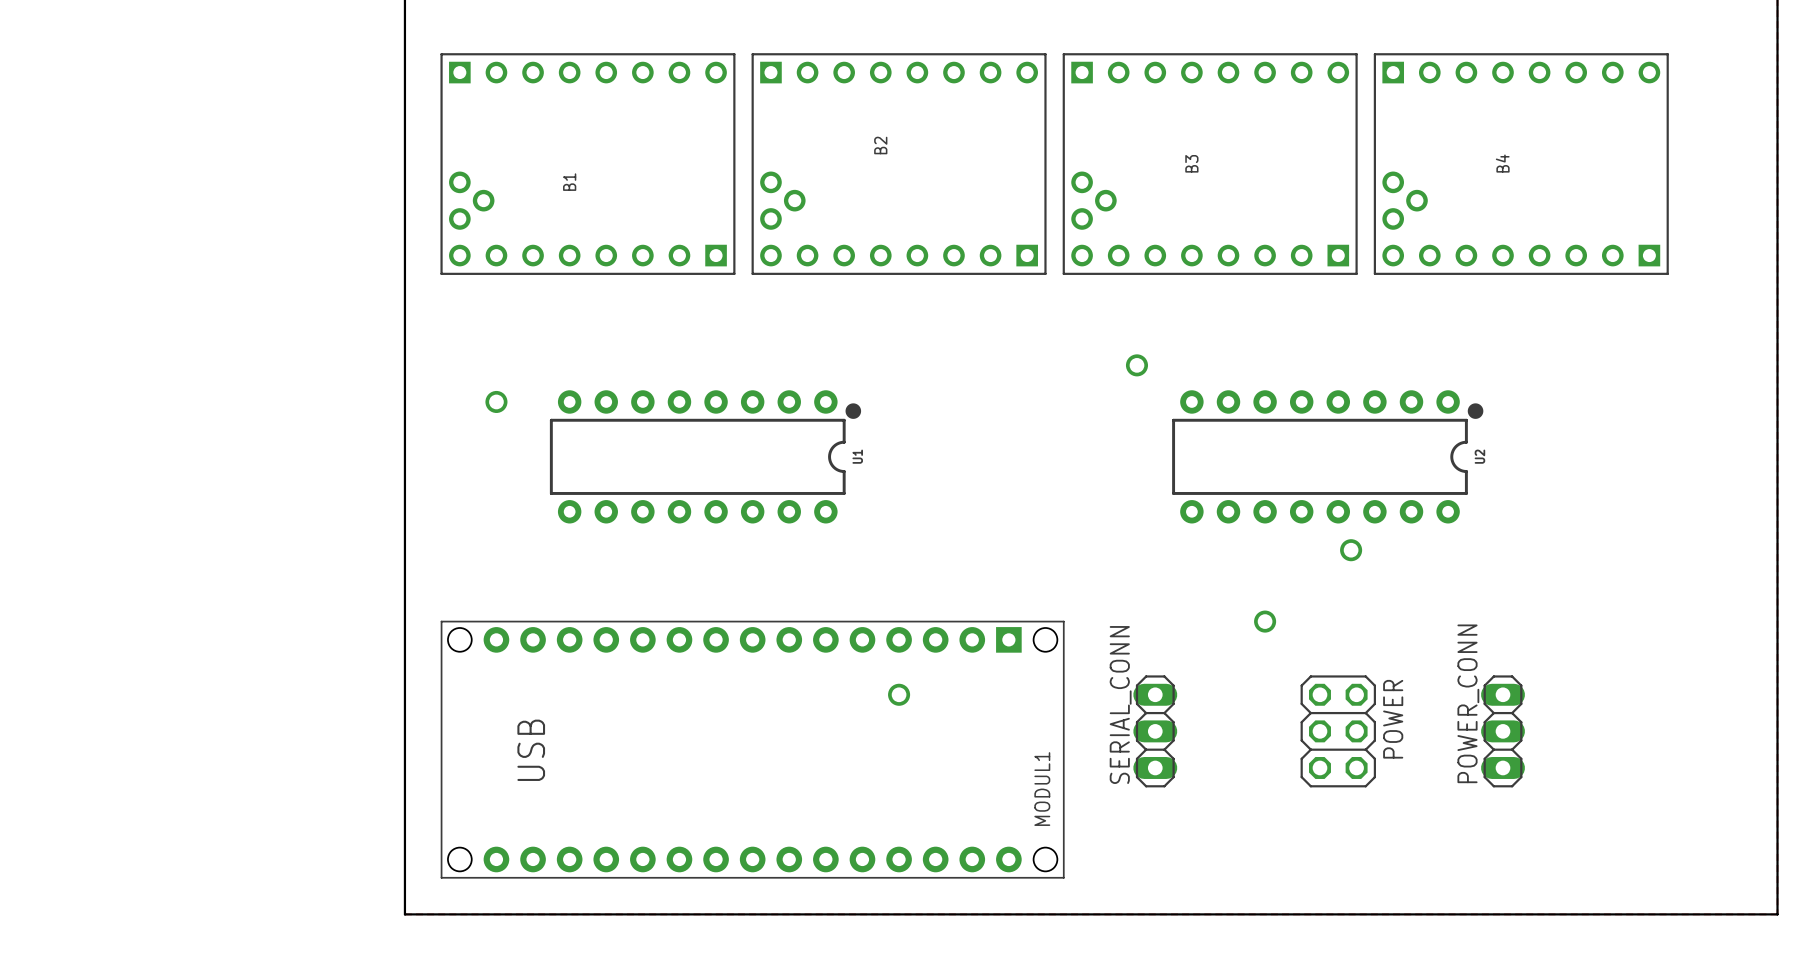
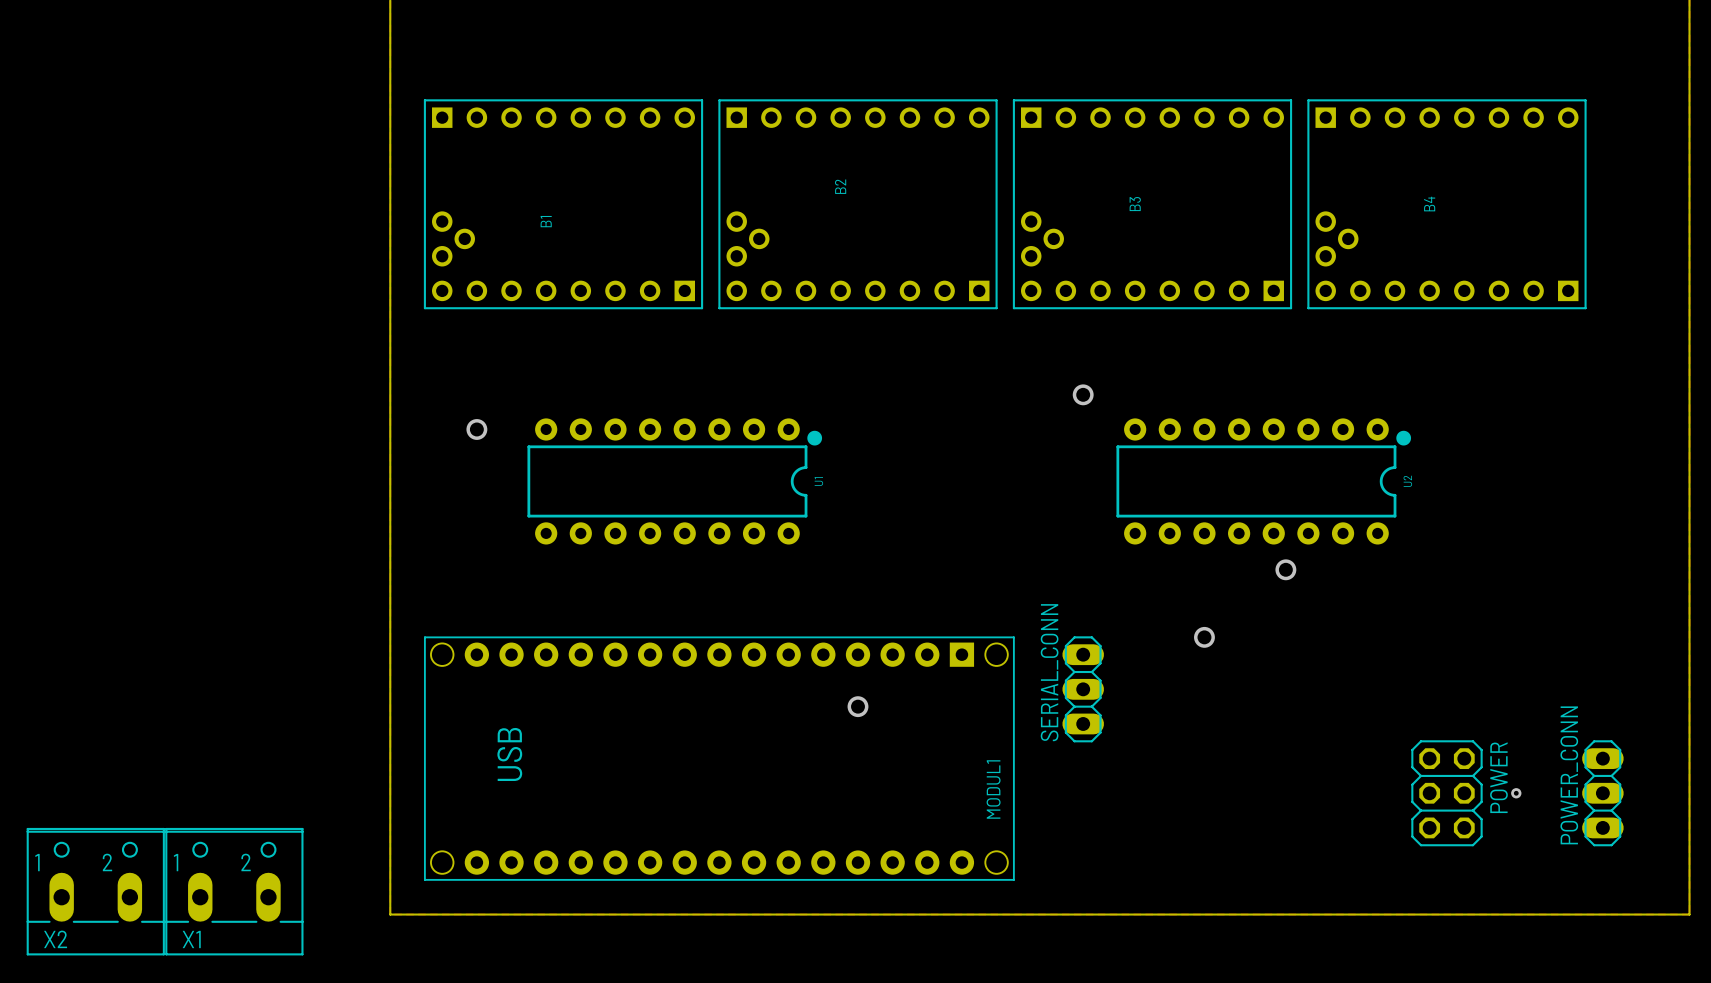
SERIAL_CONN position: (1155, 731) -> (1083, 689)
POWER position: (1338, 731) -> (1446, 793)
POWER_CONN position: (1503, 731) -> (1602, 793)
via: none -> (1516, 793)
X2: none -> (95, 891)
X1: none -> (234, 891)

